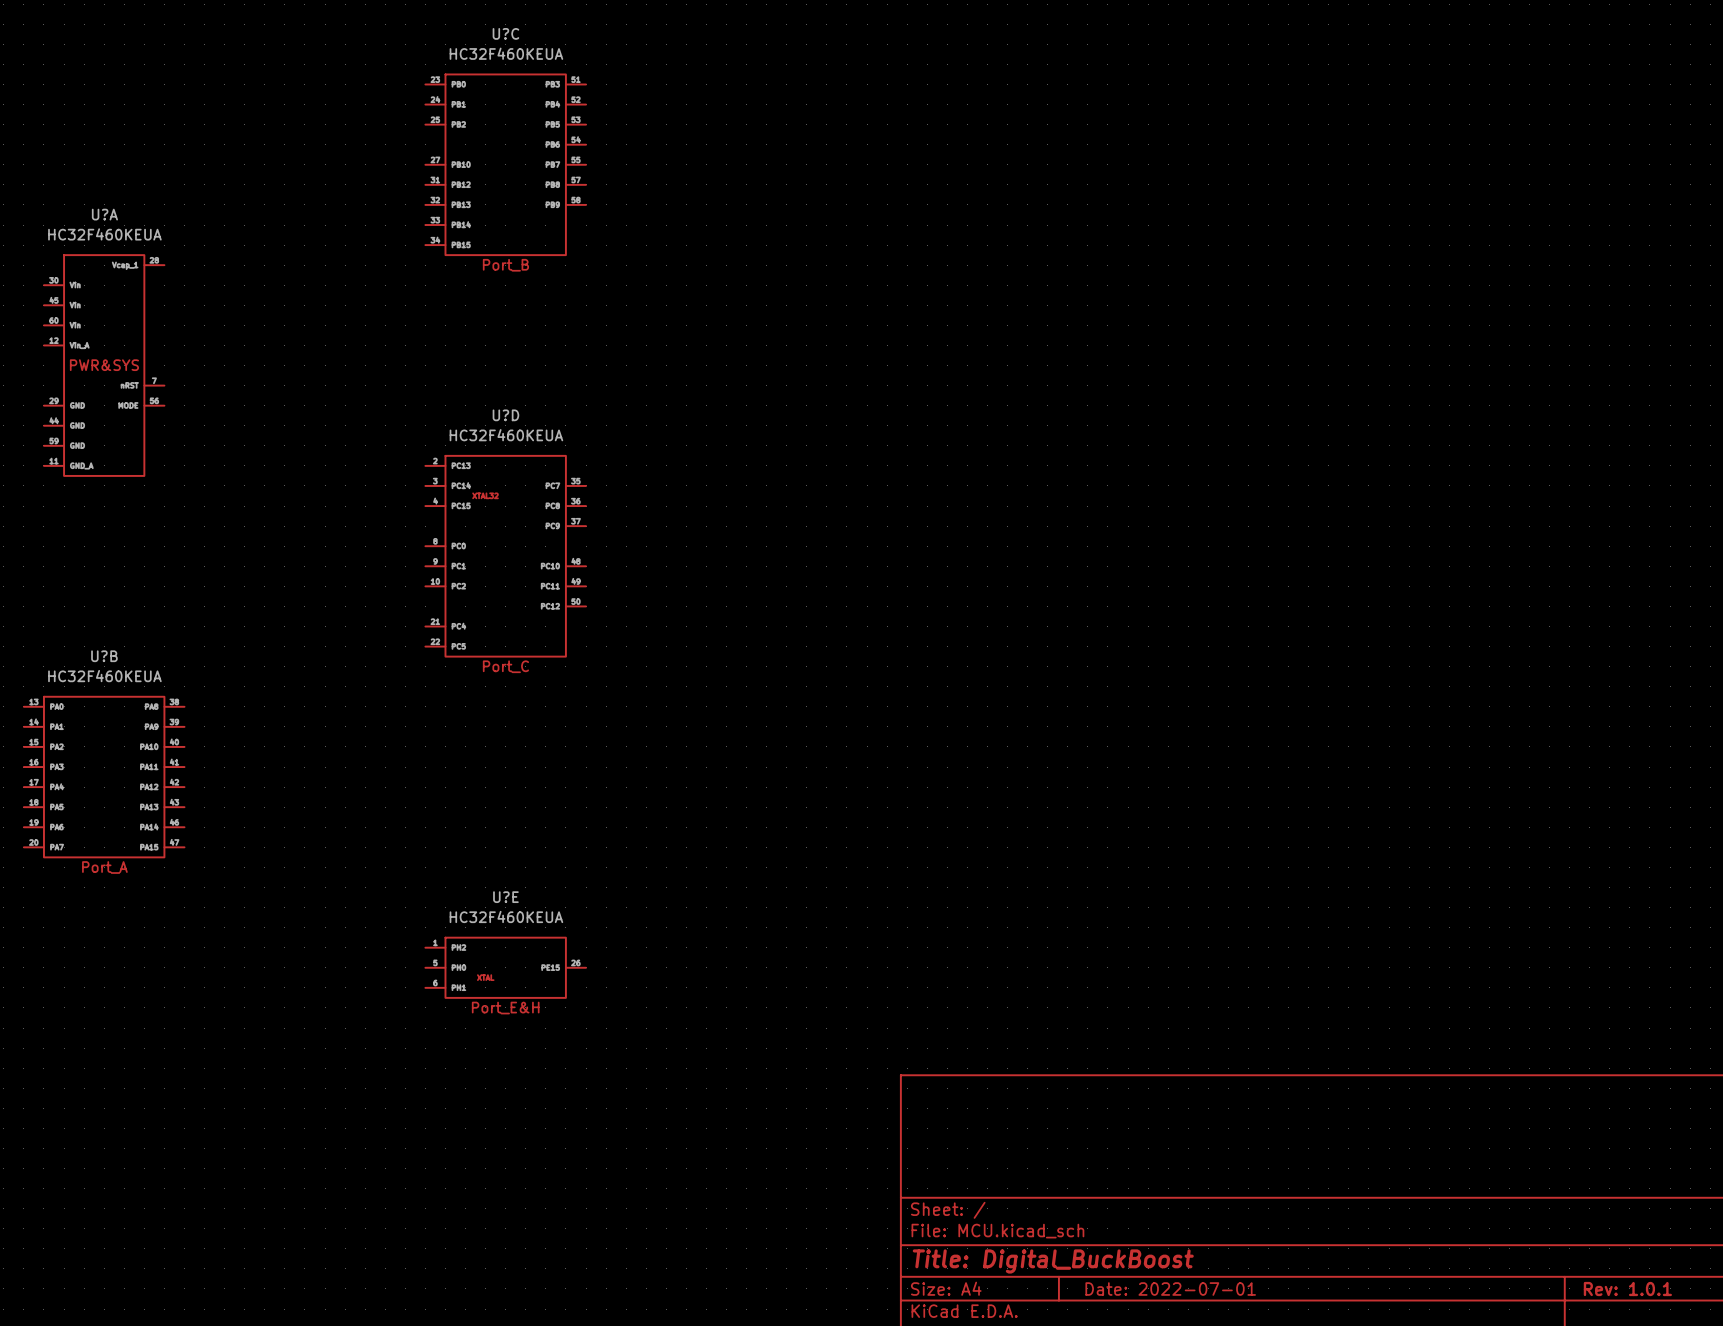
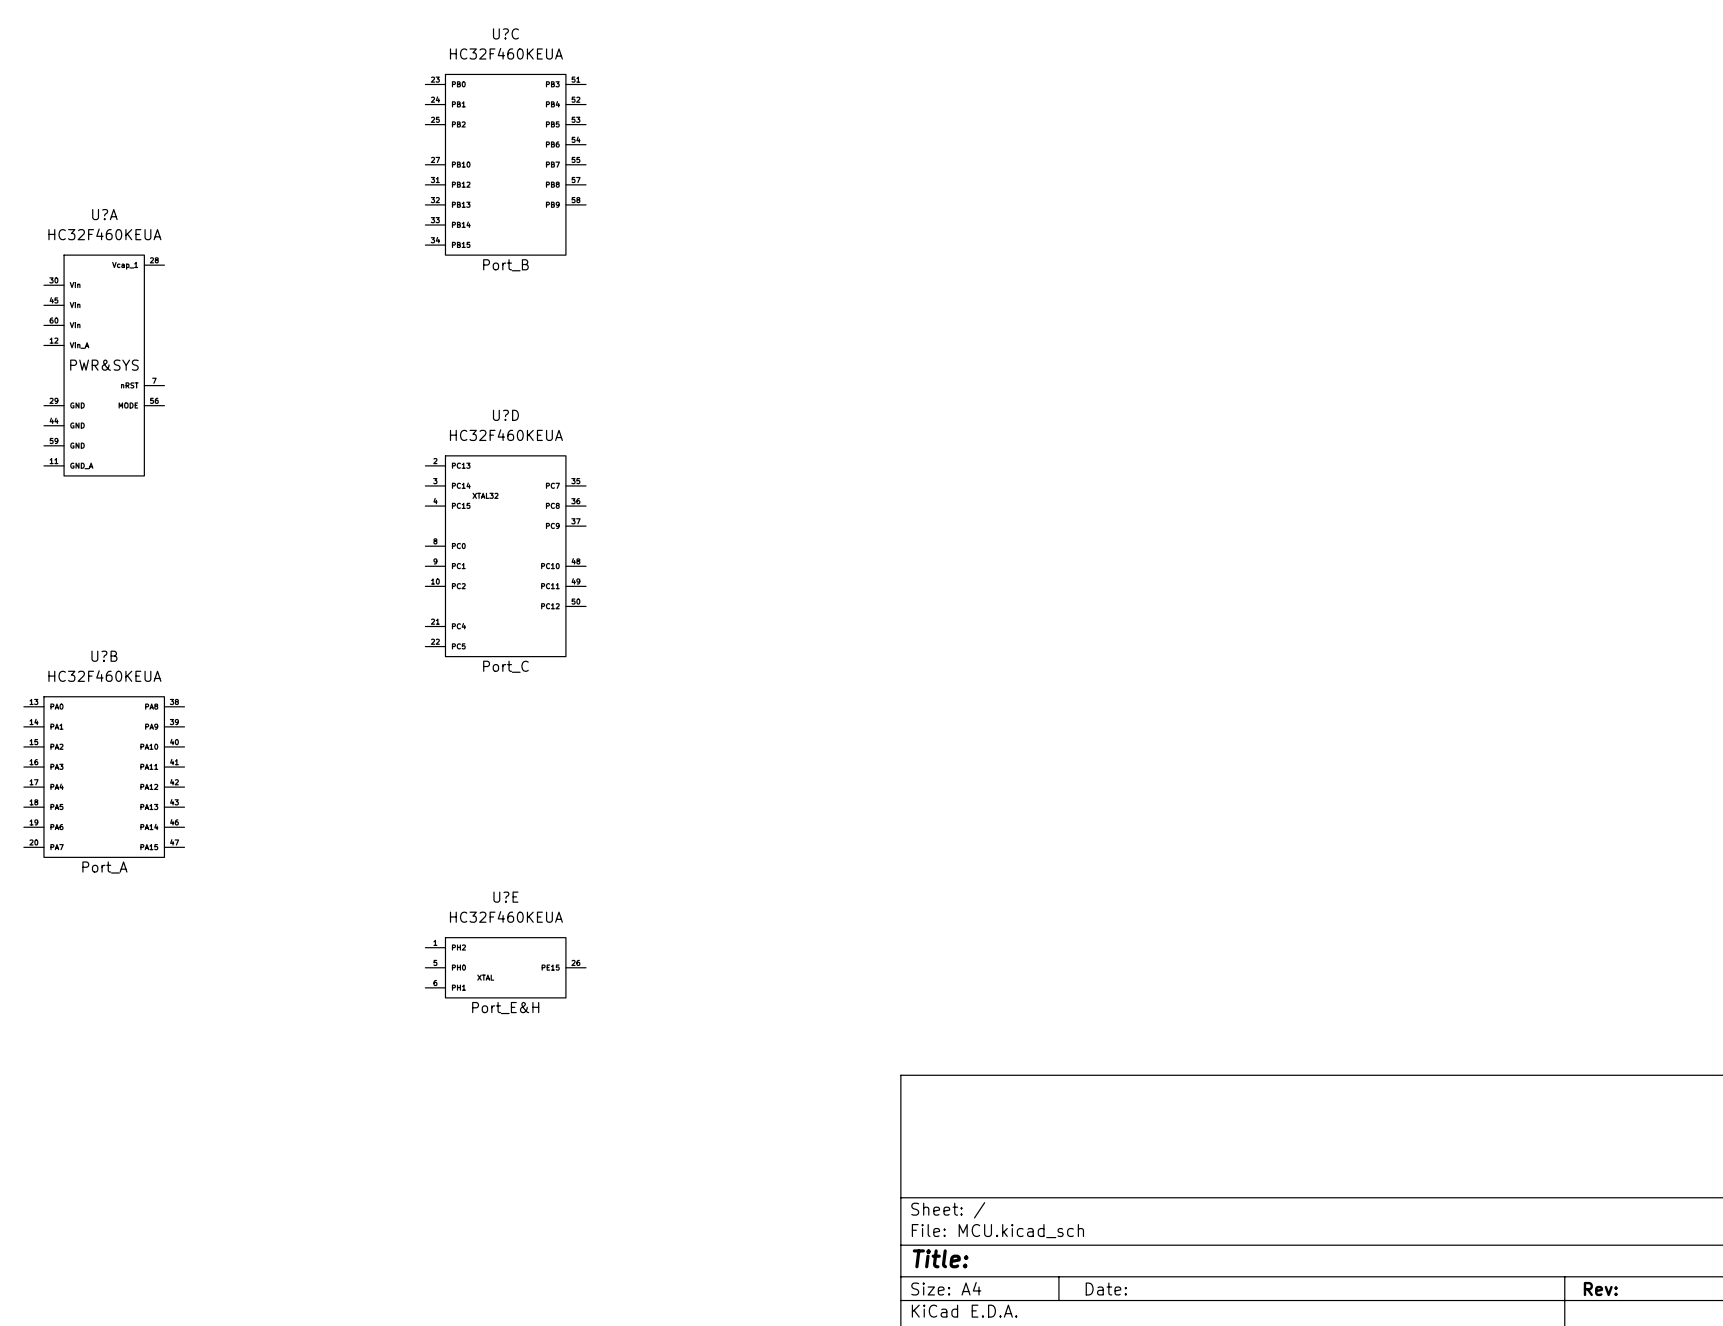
title block: Title: Digital_BuckBoost (1053, 1261) -> Title: (940, 1258)
title block: Date: 2022-07-01 (1170, 1289) -> Date: (1106, 1289)
title block: Rev: 1.0.1 (1627, 1289) -> Rev: (1600, 1289)

